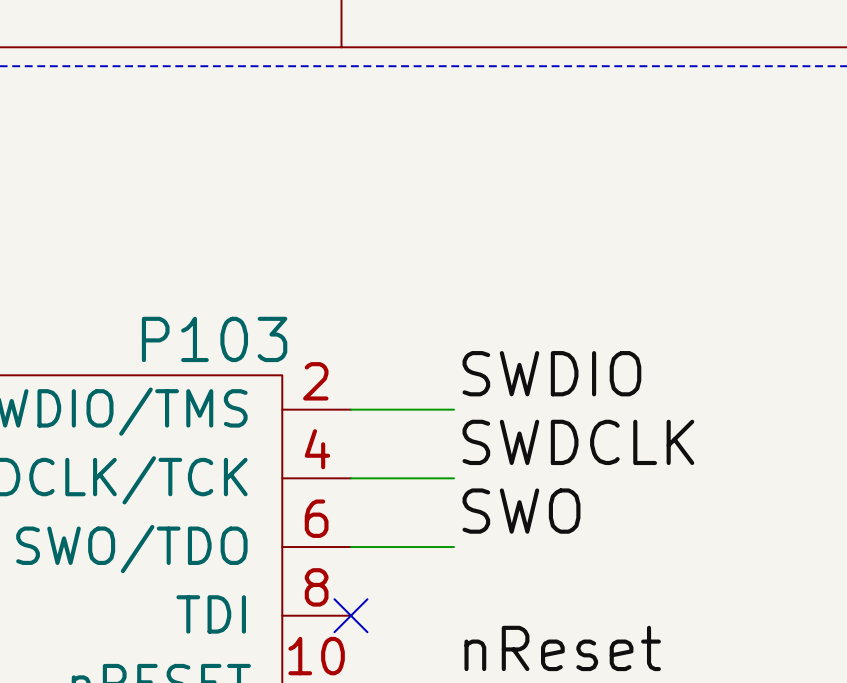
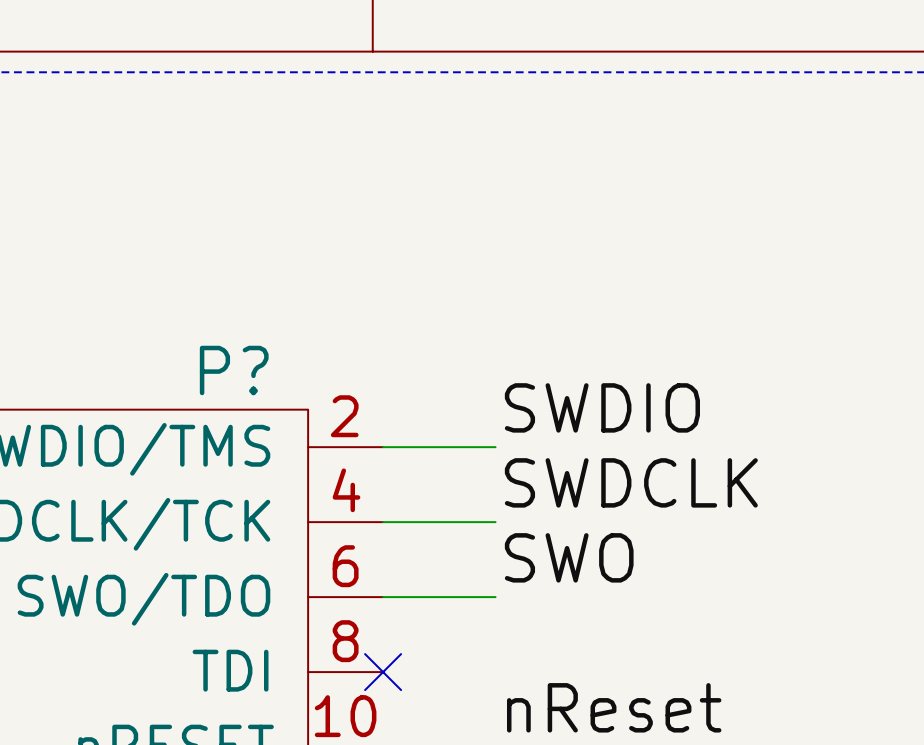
P103 name: P103 (214, 339) -> P? (234, 370)

